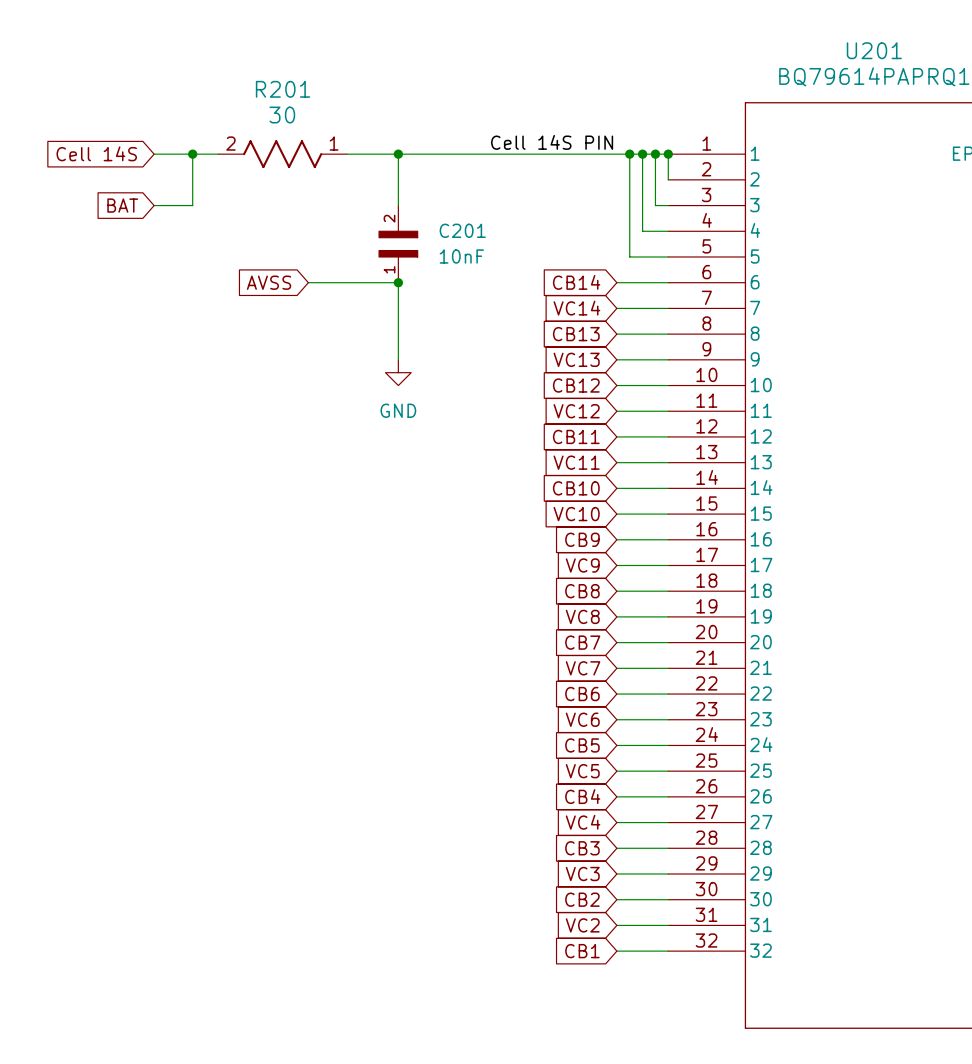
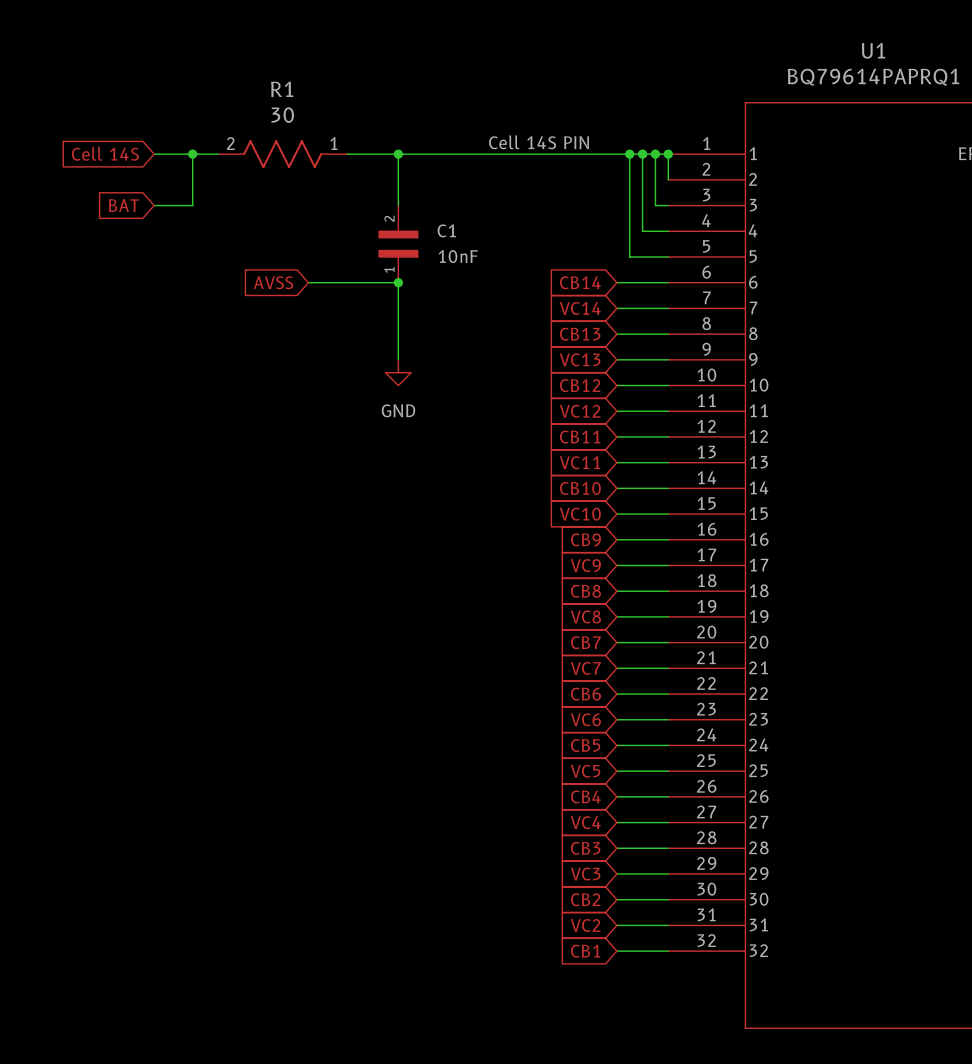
U201 name: U201 (874, 50) -> U1 (873, 50)
R201 name: R201 (283, 89) -> R1 (282, 89)
C201 name: C201 (462, 230) -> C1 (446, 230)

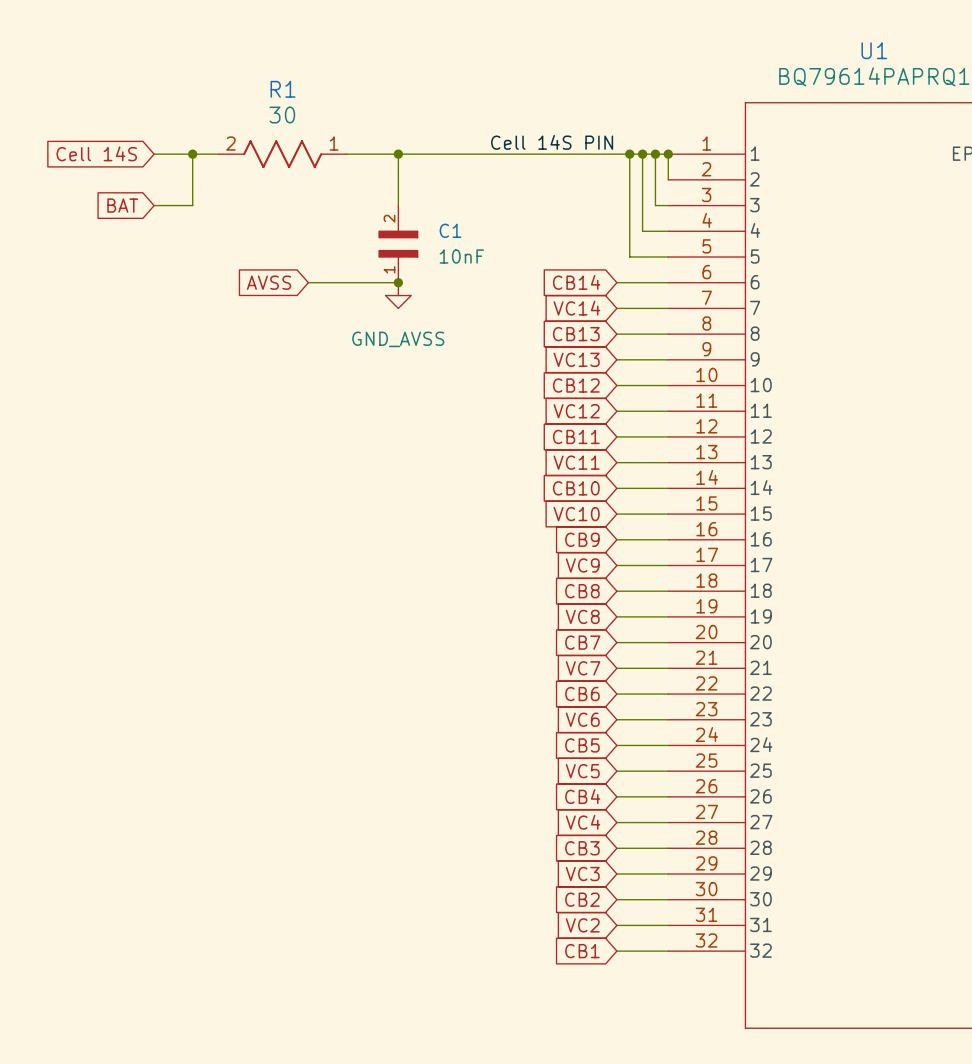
wire: (398, 282) (398, 359) -> none
power symbol: none -> GND_AVSS (398, 295)
power symbol: GND (398, 372) -> none

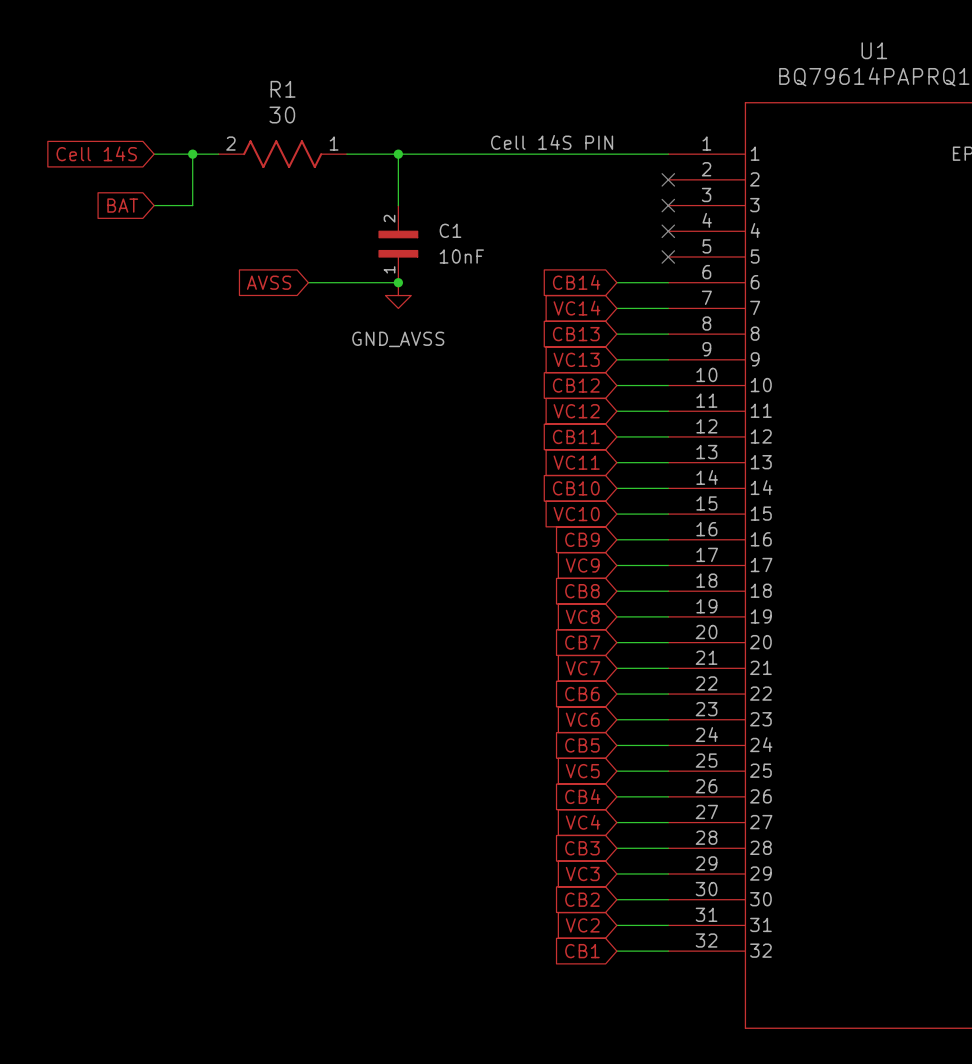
wire: (629, 154) (629, 256) (668, 256) -> none
junction: (629, 154) -> none
wire: (642, 154) (642, 231) (668, 231) -> none
junction: (642, 154) -> none
wire: (655, 154) (655, 205) (668, 205) -> none
junction: (655, 154) -> none
wire: (668, 154) (668, 179) -> none
junction: (668, 154) -> none
no-connect mark: none -> (668, 179)
no-connect mark: none -> (668, 205)
no-connect mark: none -> (668, 231)
no-connect mark: none -> (668, 256)

